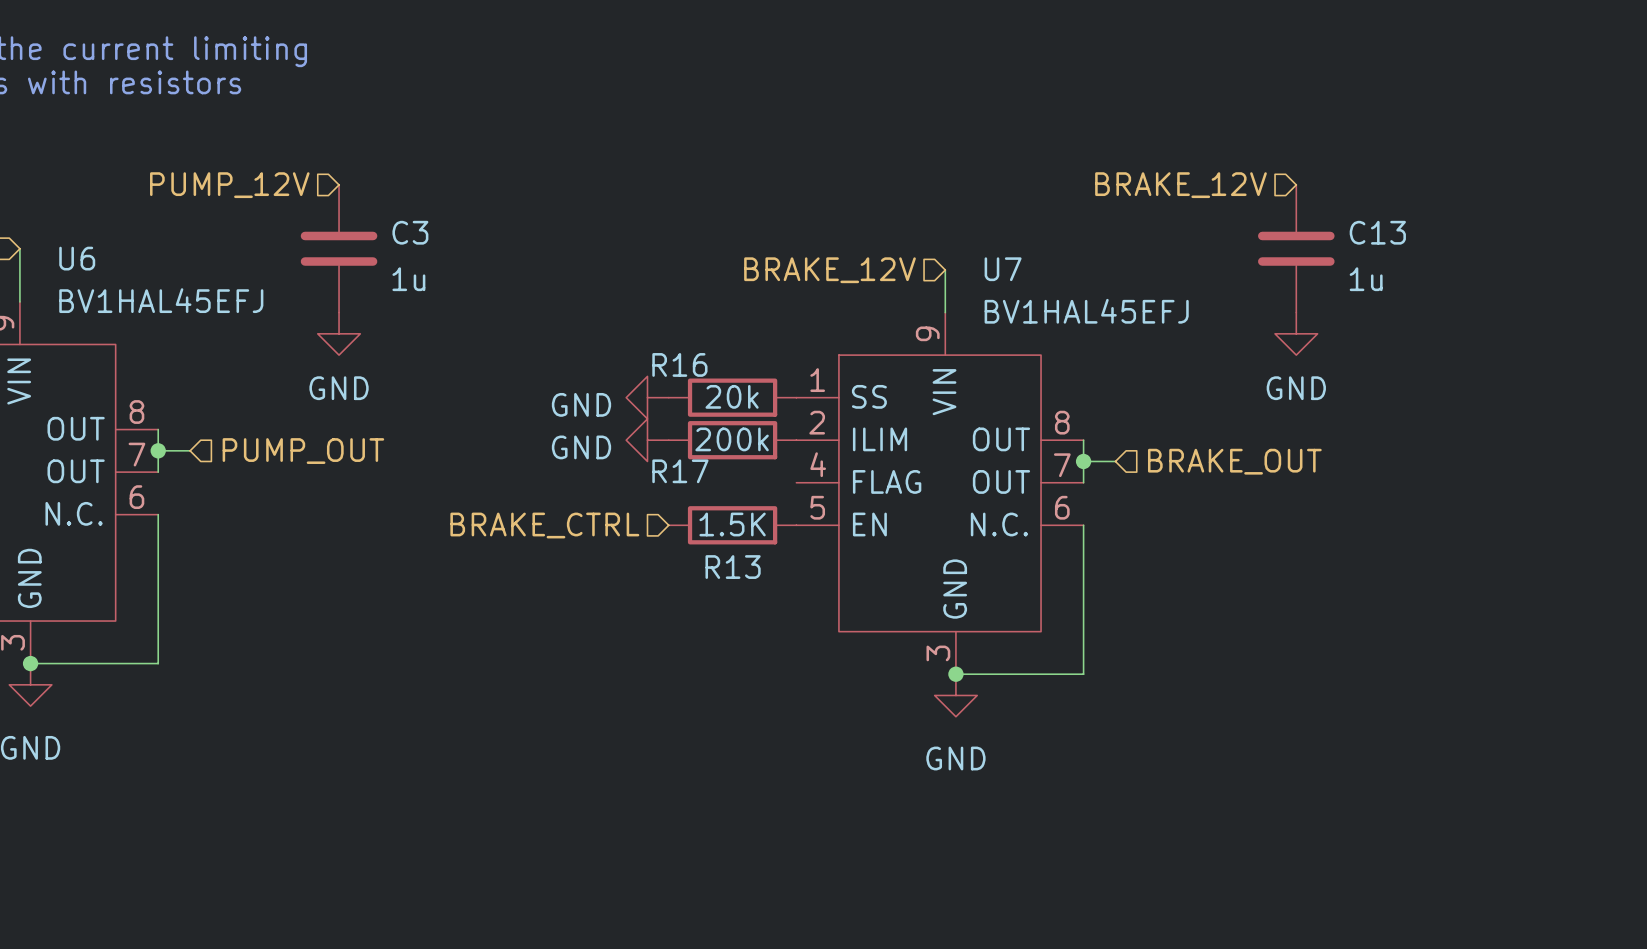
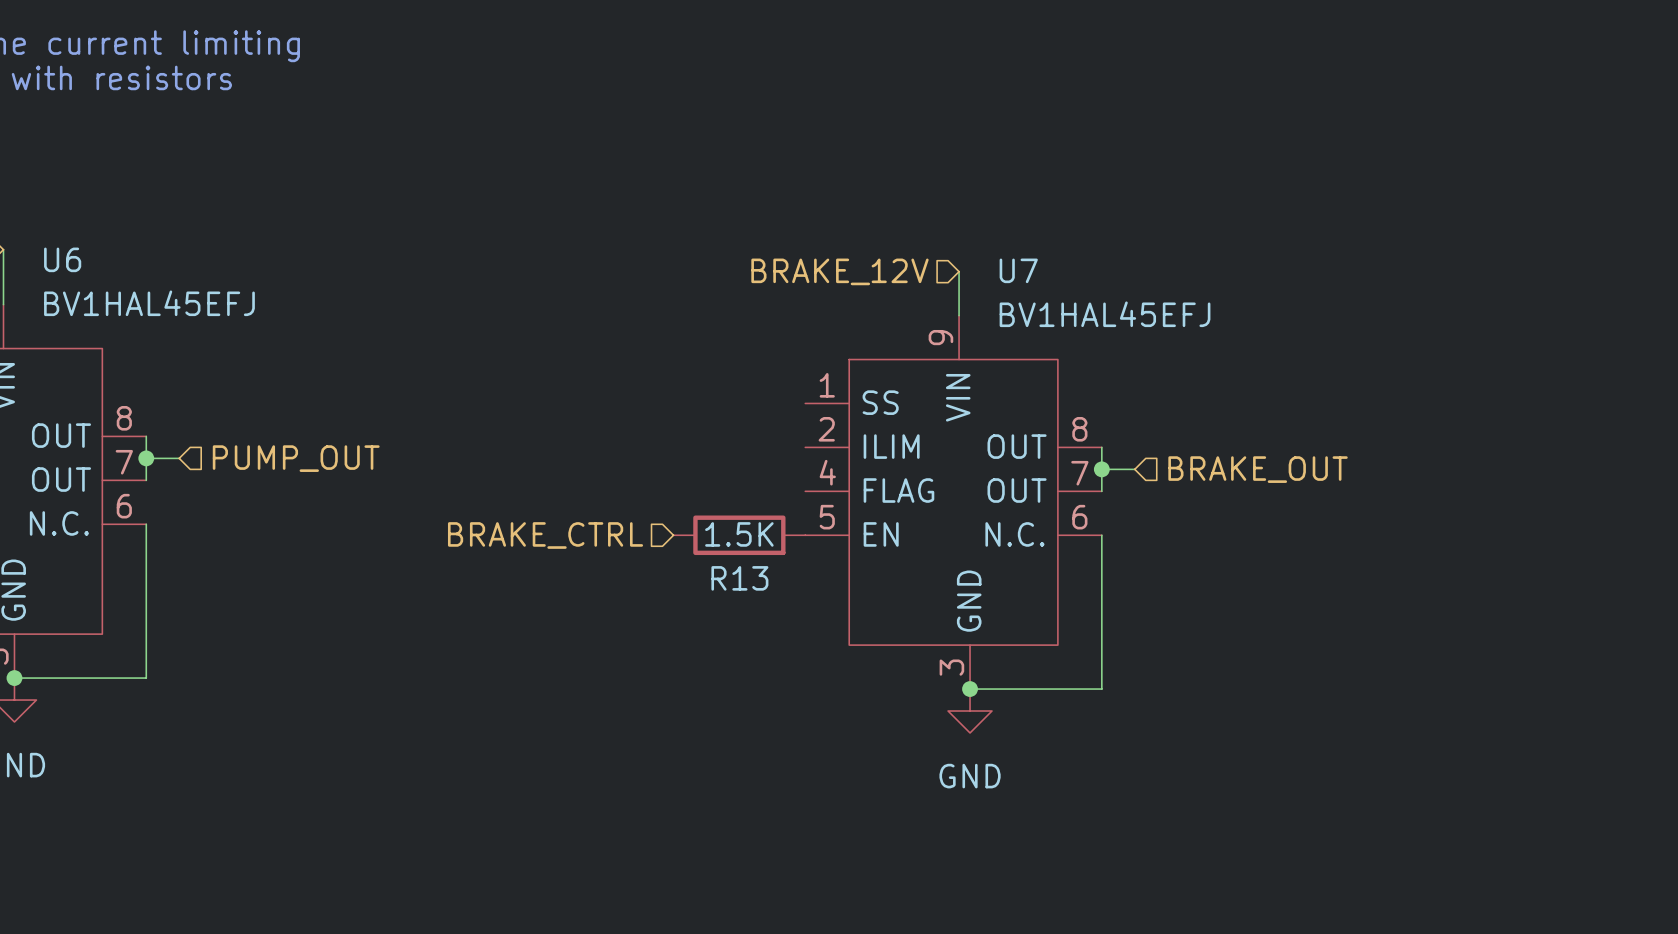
hierarchical label: PUMP_12V (229, 185) -> none
hierarchical label: BRAKE_12V (1181, 185) -> none
C3: 1u (339, 248) -> none
C13: 1u (1296, 248) -> none
power symbol: GND (339, 333) -> none
power symbol: GND (1296, 333) -> none
power symbol: GND (647, 397) -> none
R16: 20k (732, 397) -> none
power symbol: GND (647, 440) -> none
R17: 200k (732, 440) -> none

